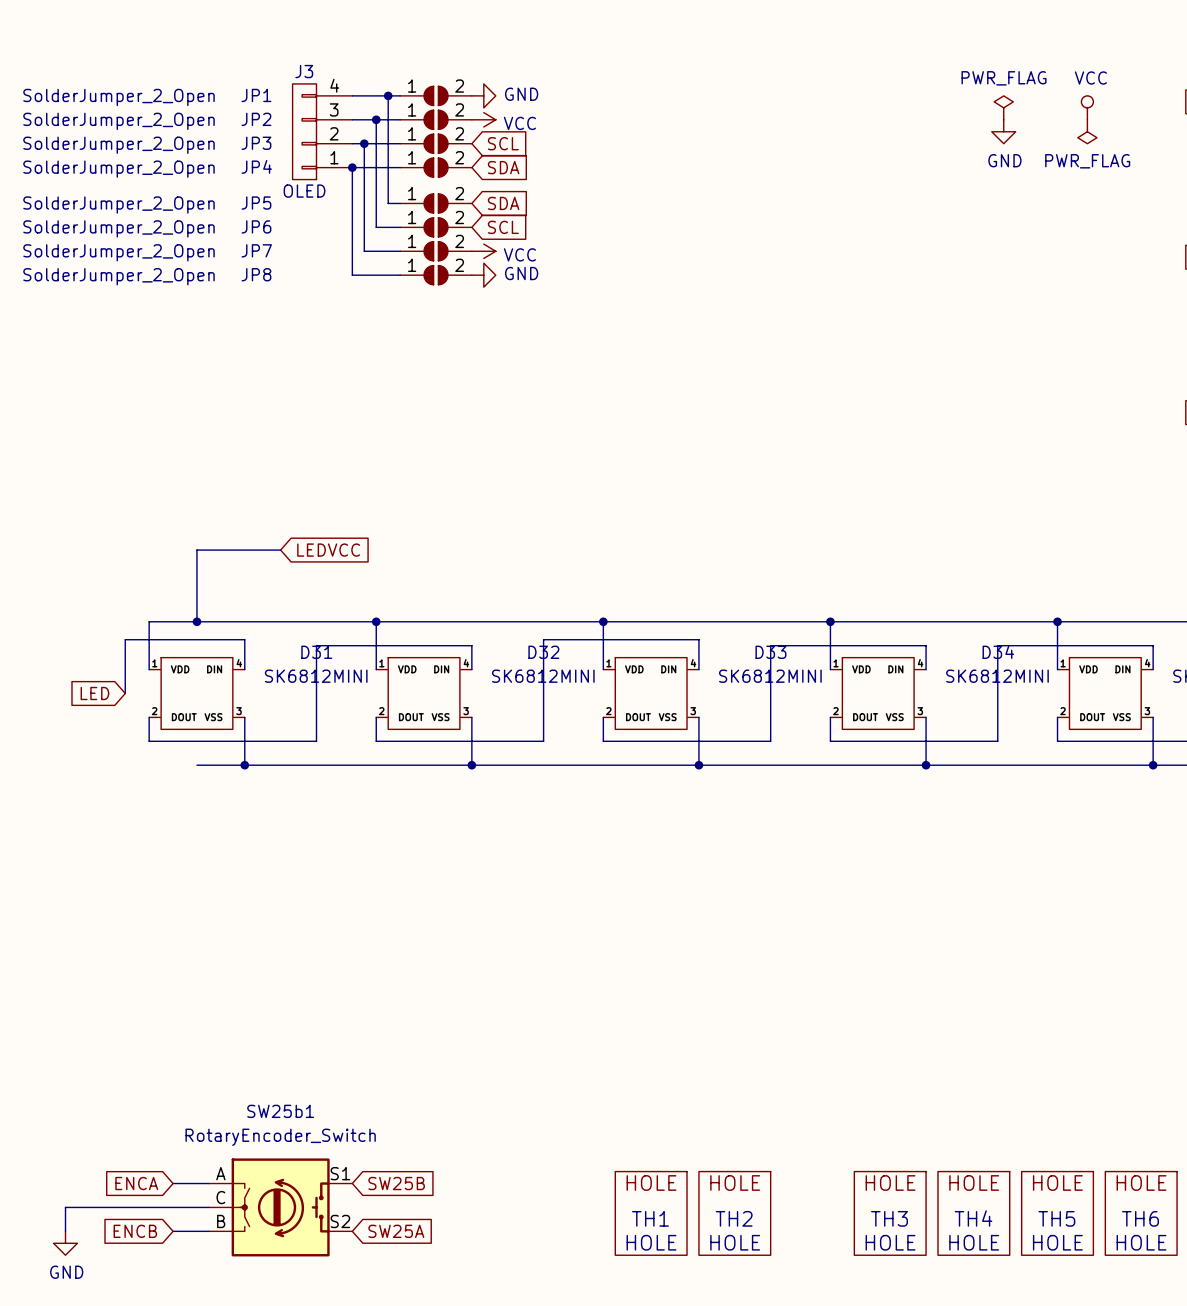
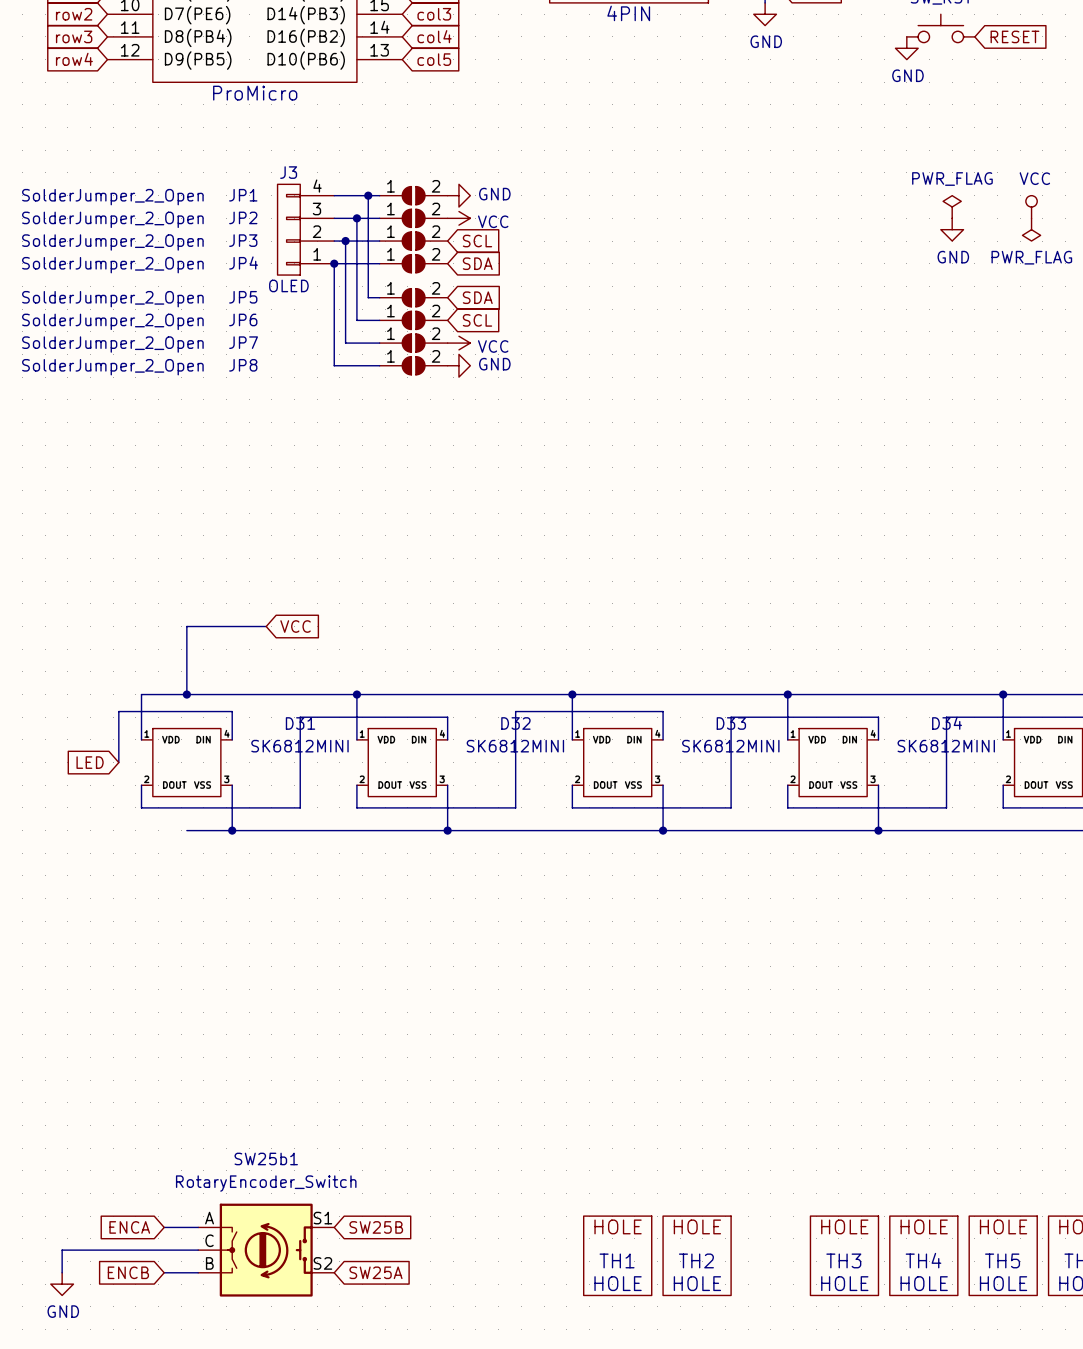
global label: LEDVCC (328, 550) -> VCC (295, 626)

